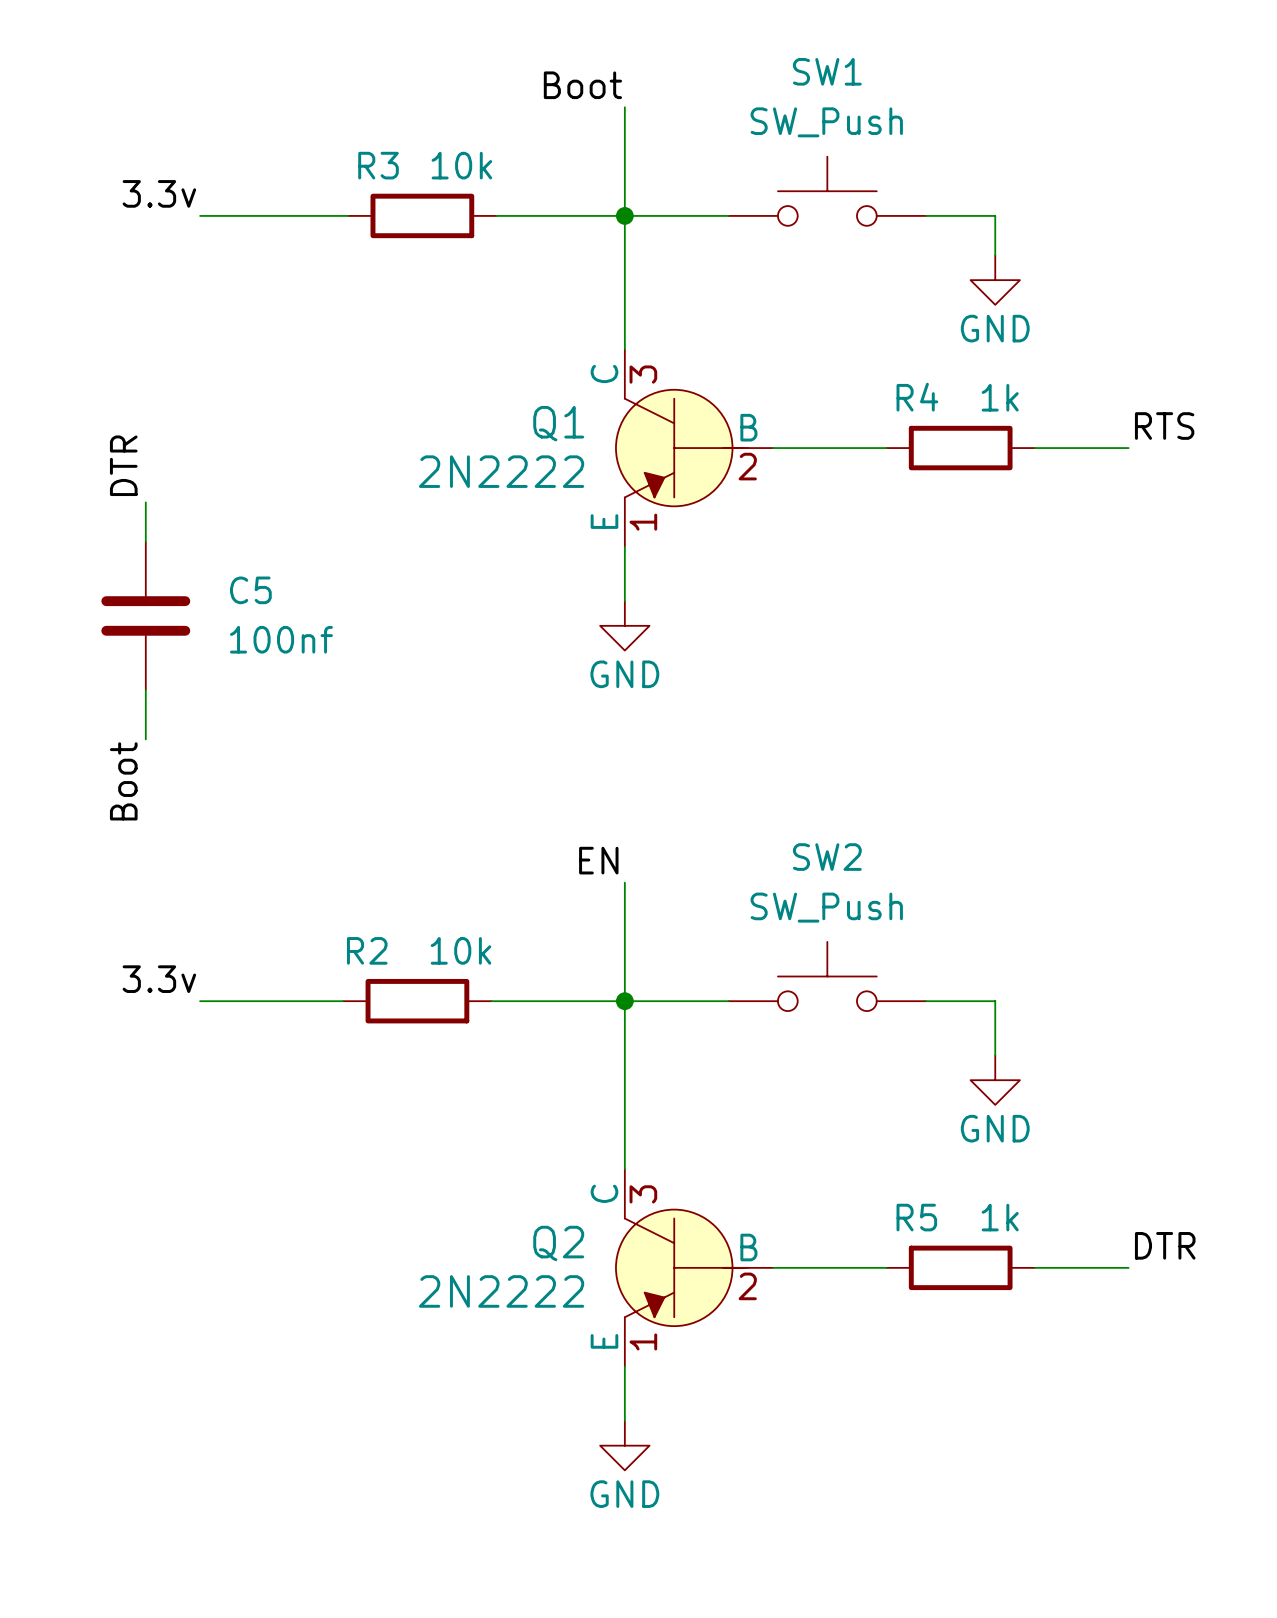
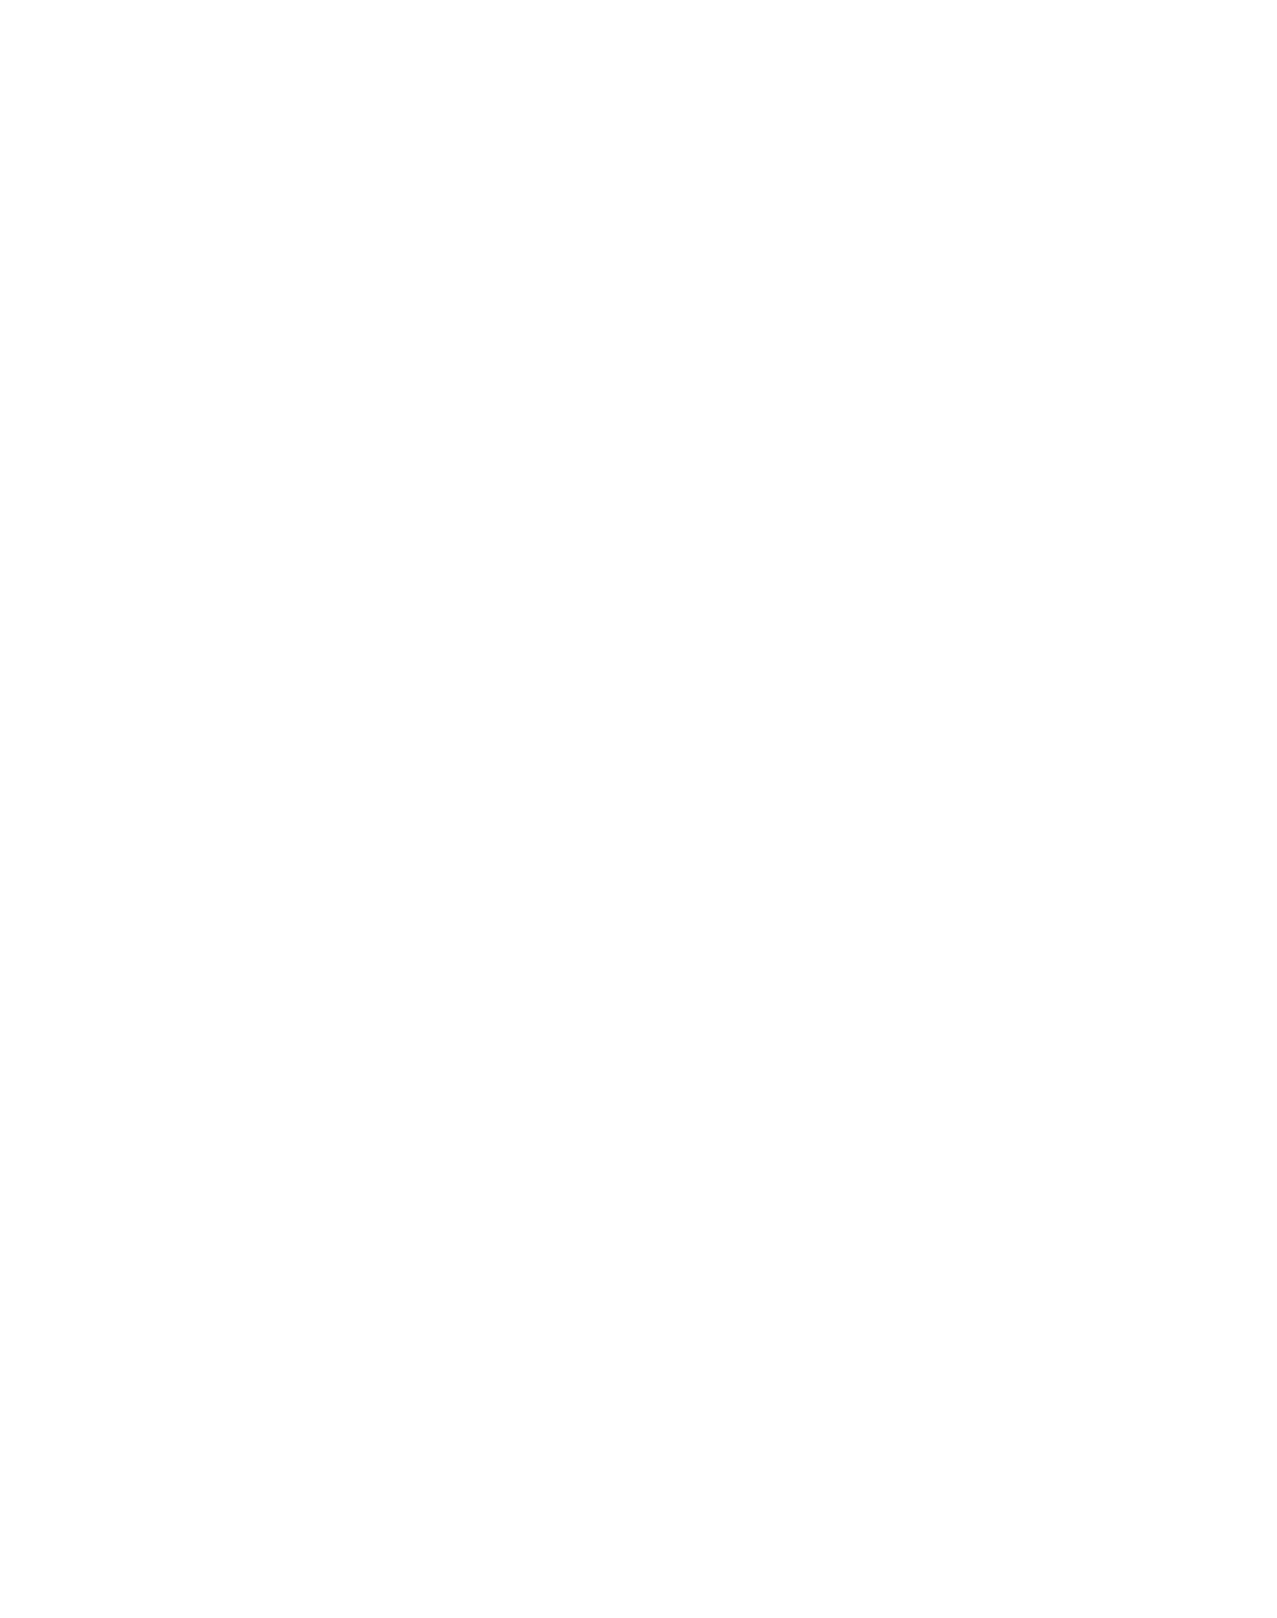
label: Boot (582, 85) -> none
wire: (624, 107) (624, 349) -> none
SW1: SW_Push (827, 191) -> none
label: 3.3v (159, 193) -> none
wire: (200, 215) (348, 215) -> none
R3: 10k (422, 215) -> none
wire: (496, 215) (728, 215) -> none
junction: (624, 215) -> none
wire: (926, 215) (995, 215) (995, 255) -> none
power symbol: GND (995, 280) -> none
label: RTS (1164, 426) -> none
Q1: 2N2222 (694, 448) -> none
wire: (773, 448) (886, 448) -> none
R4: 1k (960, 448) -> none
wire: (1034, 448) (1128, 448) -> none
label: DTR (123, 465) -> none
wire: (145, 502) (145, 541) -> none
wire: (624, 546) (624, 601) -> none
C5: 100nf (145, 615) -> none
power symbol: GND (624, 625) -> none
wire: (145, 690) (145, 739) -> none
label: Boot (123, 781) -> none
label: EN (598, 860) -> none
wire: (624, 882) (624, 1169) -> none
SW2: SW_Push (827, 976) -> none
label: 3.3v (159, 979) -> none
wire: (200, 1001) (343, 1001) -> none
R2: 10k (417, 1001) -> none
wire: (491, 1001) (728, 1001) -> none
junction: (624, 1001) -> none
wire: (926, 1001) (995, 1001) (995, 1055) -> none
power symbol: GND (995, 1080) -> none
label: DTR (1165, 1245) -> none
Q2: 2N2222 (694, 1267) -> none
wire: (773, 1267) (886, 1267) -> none
R5: 1k (960, 1267) -> none
wire: (1034, 1267) (1128, 1267) -> none
wire: (624, 1366) (624, 1420) -> none
power symbol: GND (624, 1445) -> none

